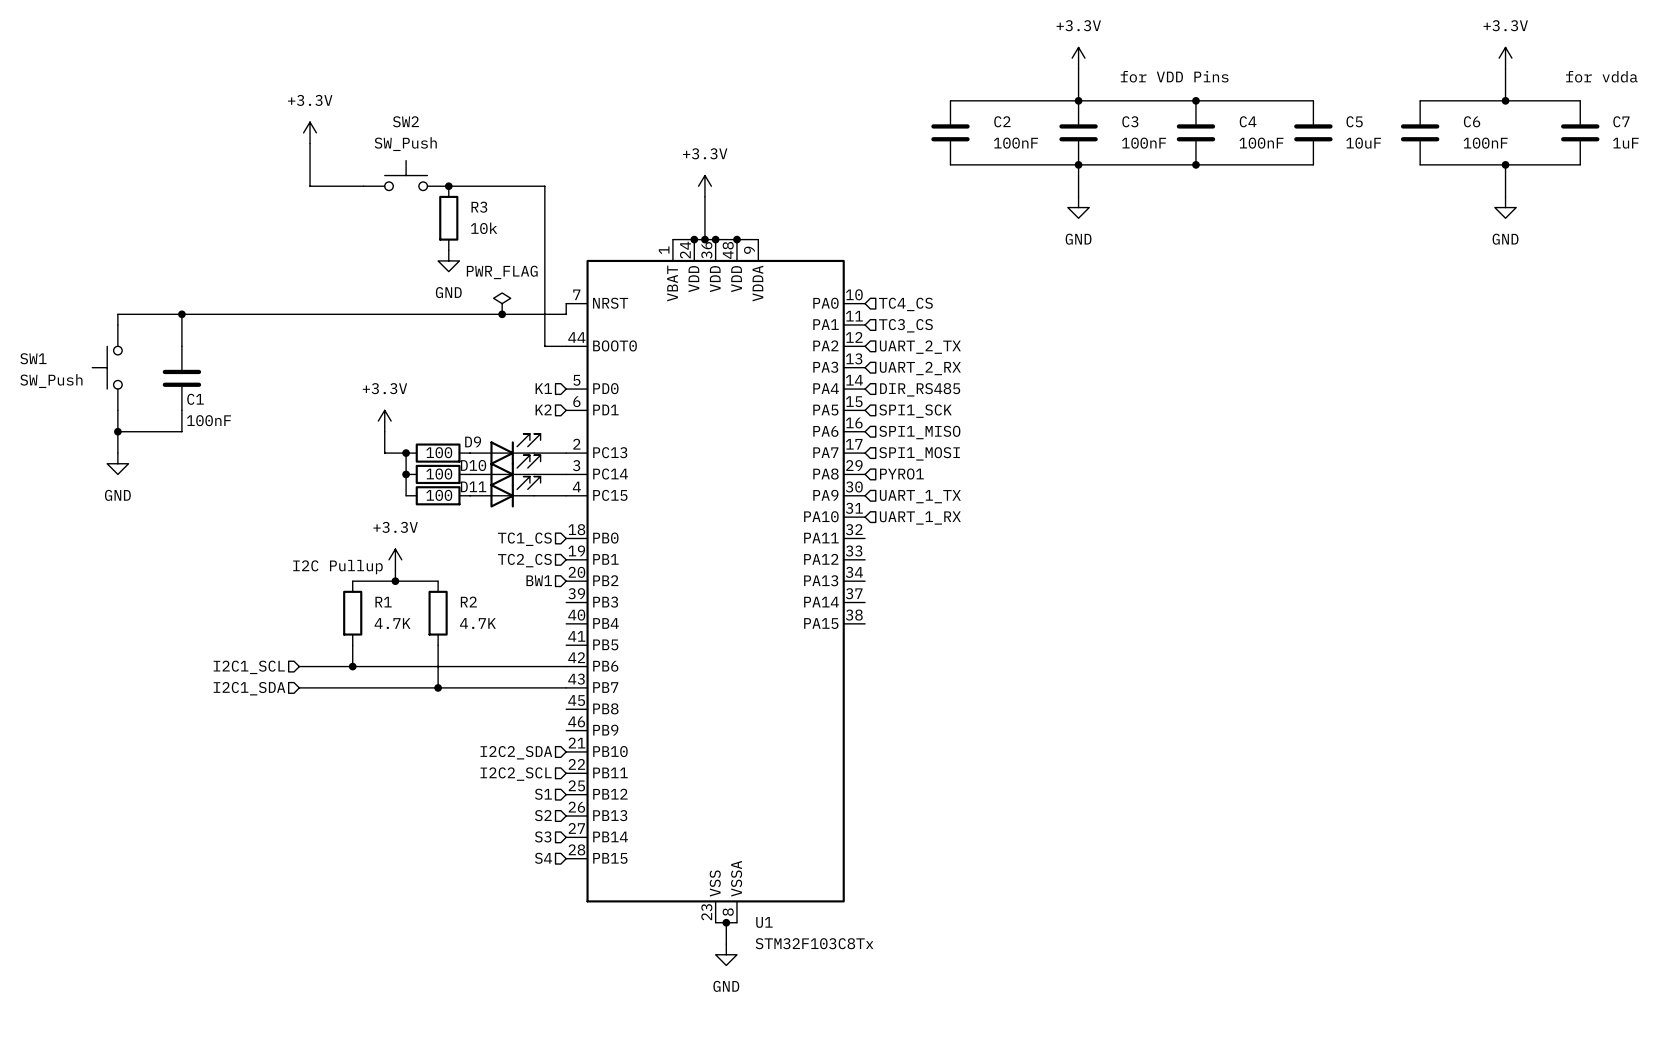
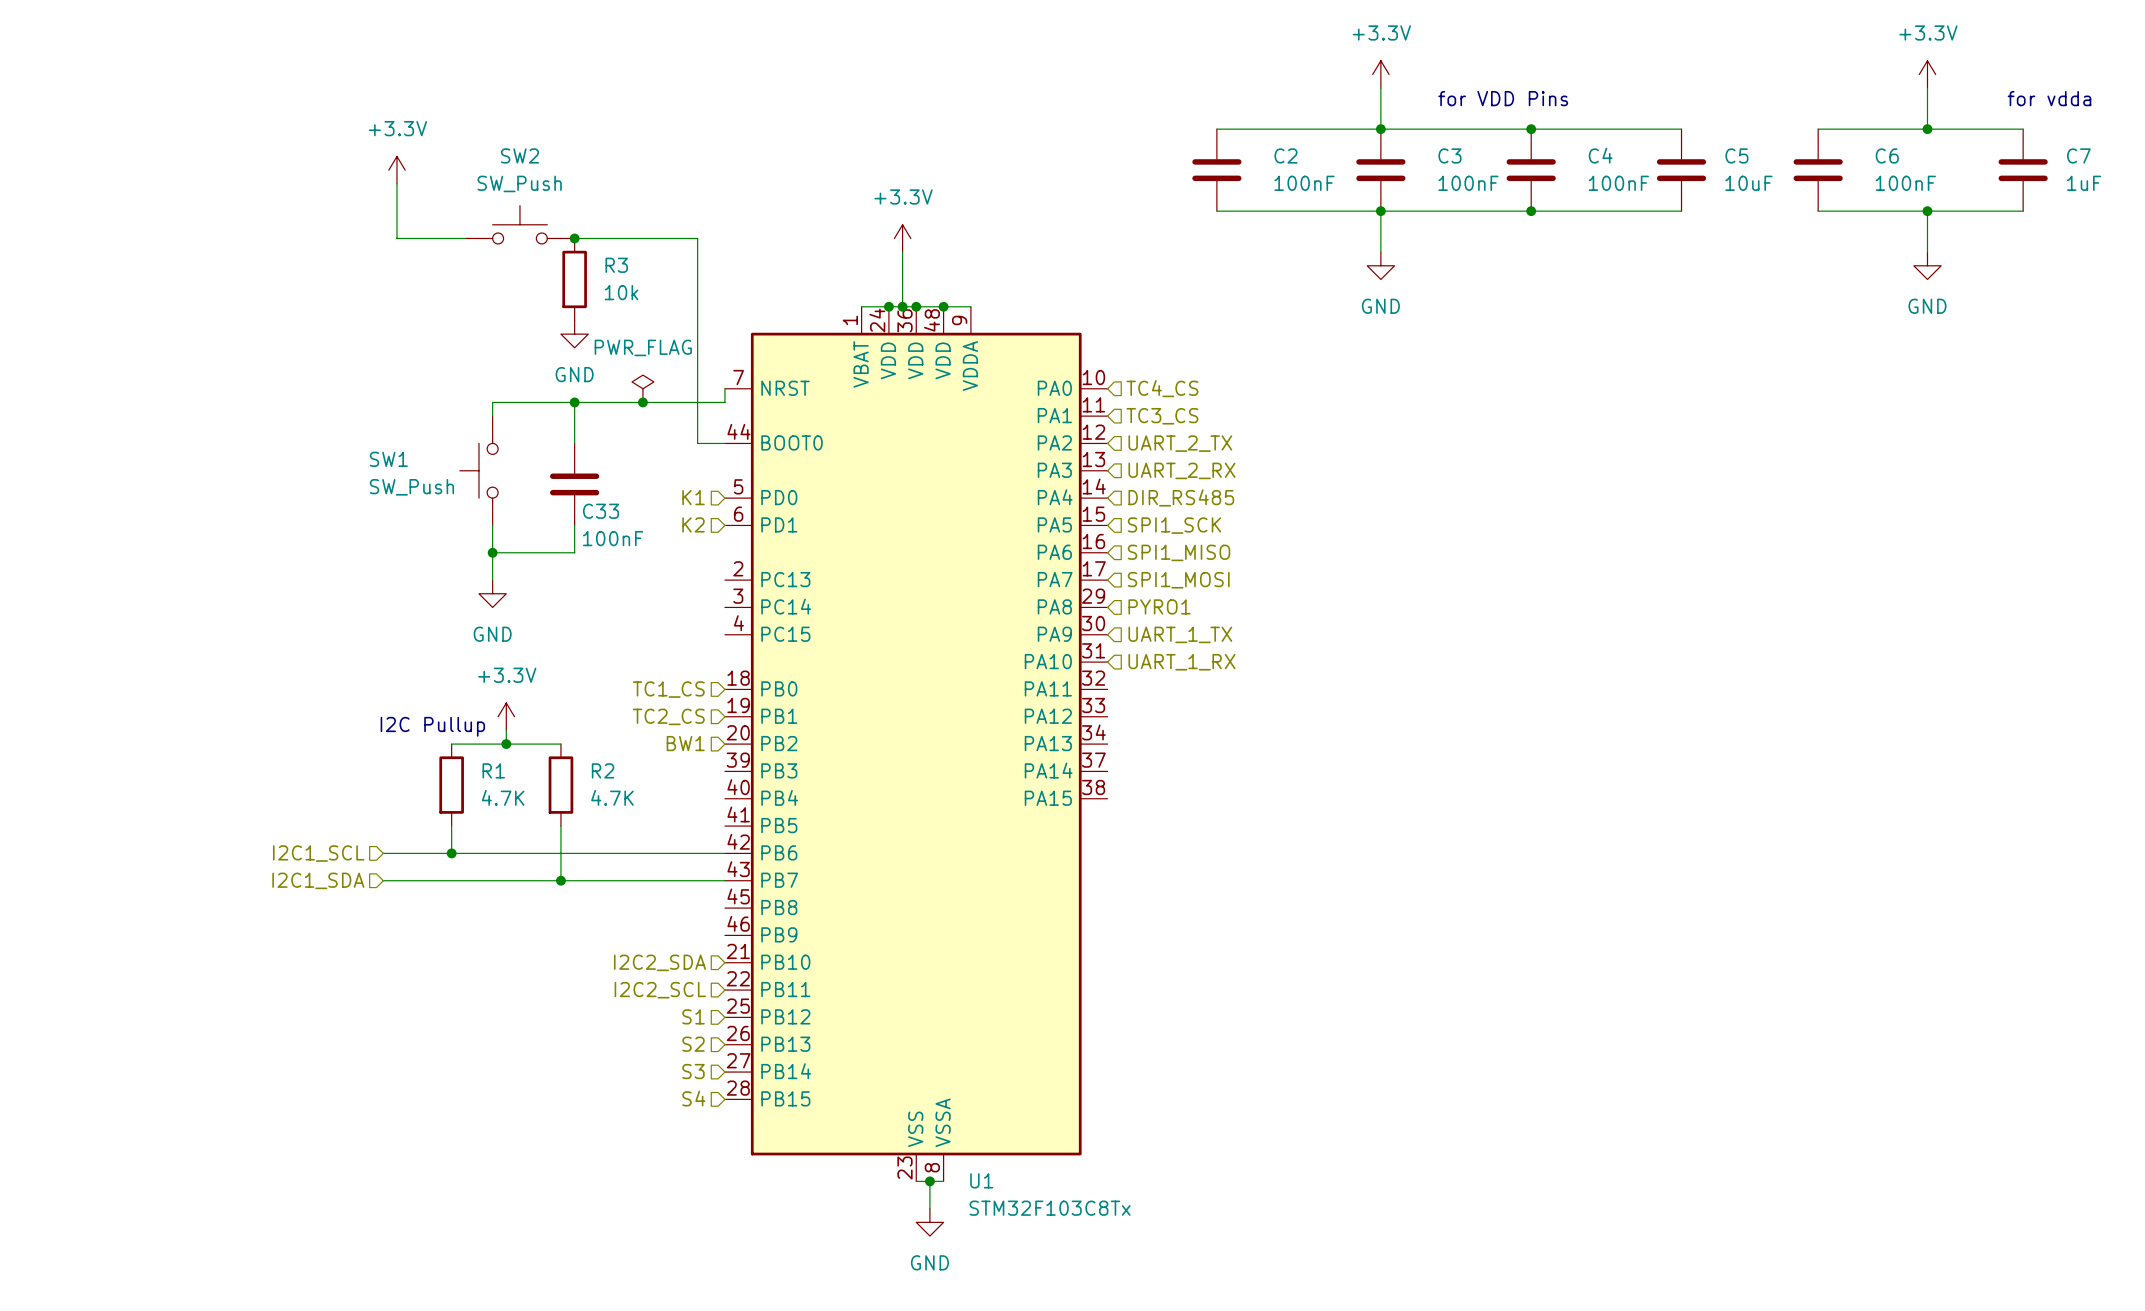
wire: (181, 314) (181, 346) -> none
junction: (181, 314) -> none
wire: (384, 314) (117, 314) (117, 324) -> (492, 402) (492, 416)
wire: none -> (574, 402) (574, 443)
junction: none -> (574, 402)
SW1 position: (107, 367) -> (478, 470)
C1: 100nF (181, 378) -> none
C33: none -> 100nF (574, 484)
wire: (117, 410) (117, 453) -> none
wire: (181, 410) (181, 431) (117, 431) -> none
wire: none -> (492, 525) (492, 552) (574, 552) (574, 525)
power symbol: +3.3V (384, 421) -> none
junction: (117, 431) -> none
junction: none -> (492, 552)
D9: (505, 449) -> none
wire: (384, 453) (406, 453) (406, 495) -> none
junction: (406, 453) -> none
part: 100 (438, 453) -> none
wire: (534, 453) (566, 453) -> none
power symbol: GND (117, 463) -> none
power symbol: none -> GND (492, 593)
D10: (505, 470) -> none
junction: (406, 474) -> none
part: 100 (438, 474) -> none
wire: (534, 474) (566, 474) -> none
D11: (505, 492) -> none
part: 100 (438, 495) -> none
wire: (534, 495) (566, 495) -> none

